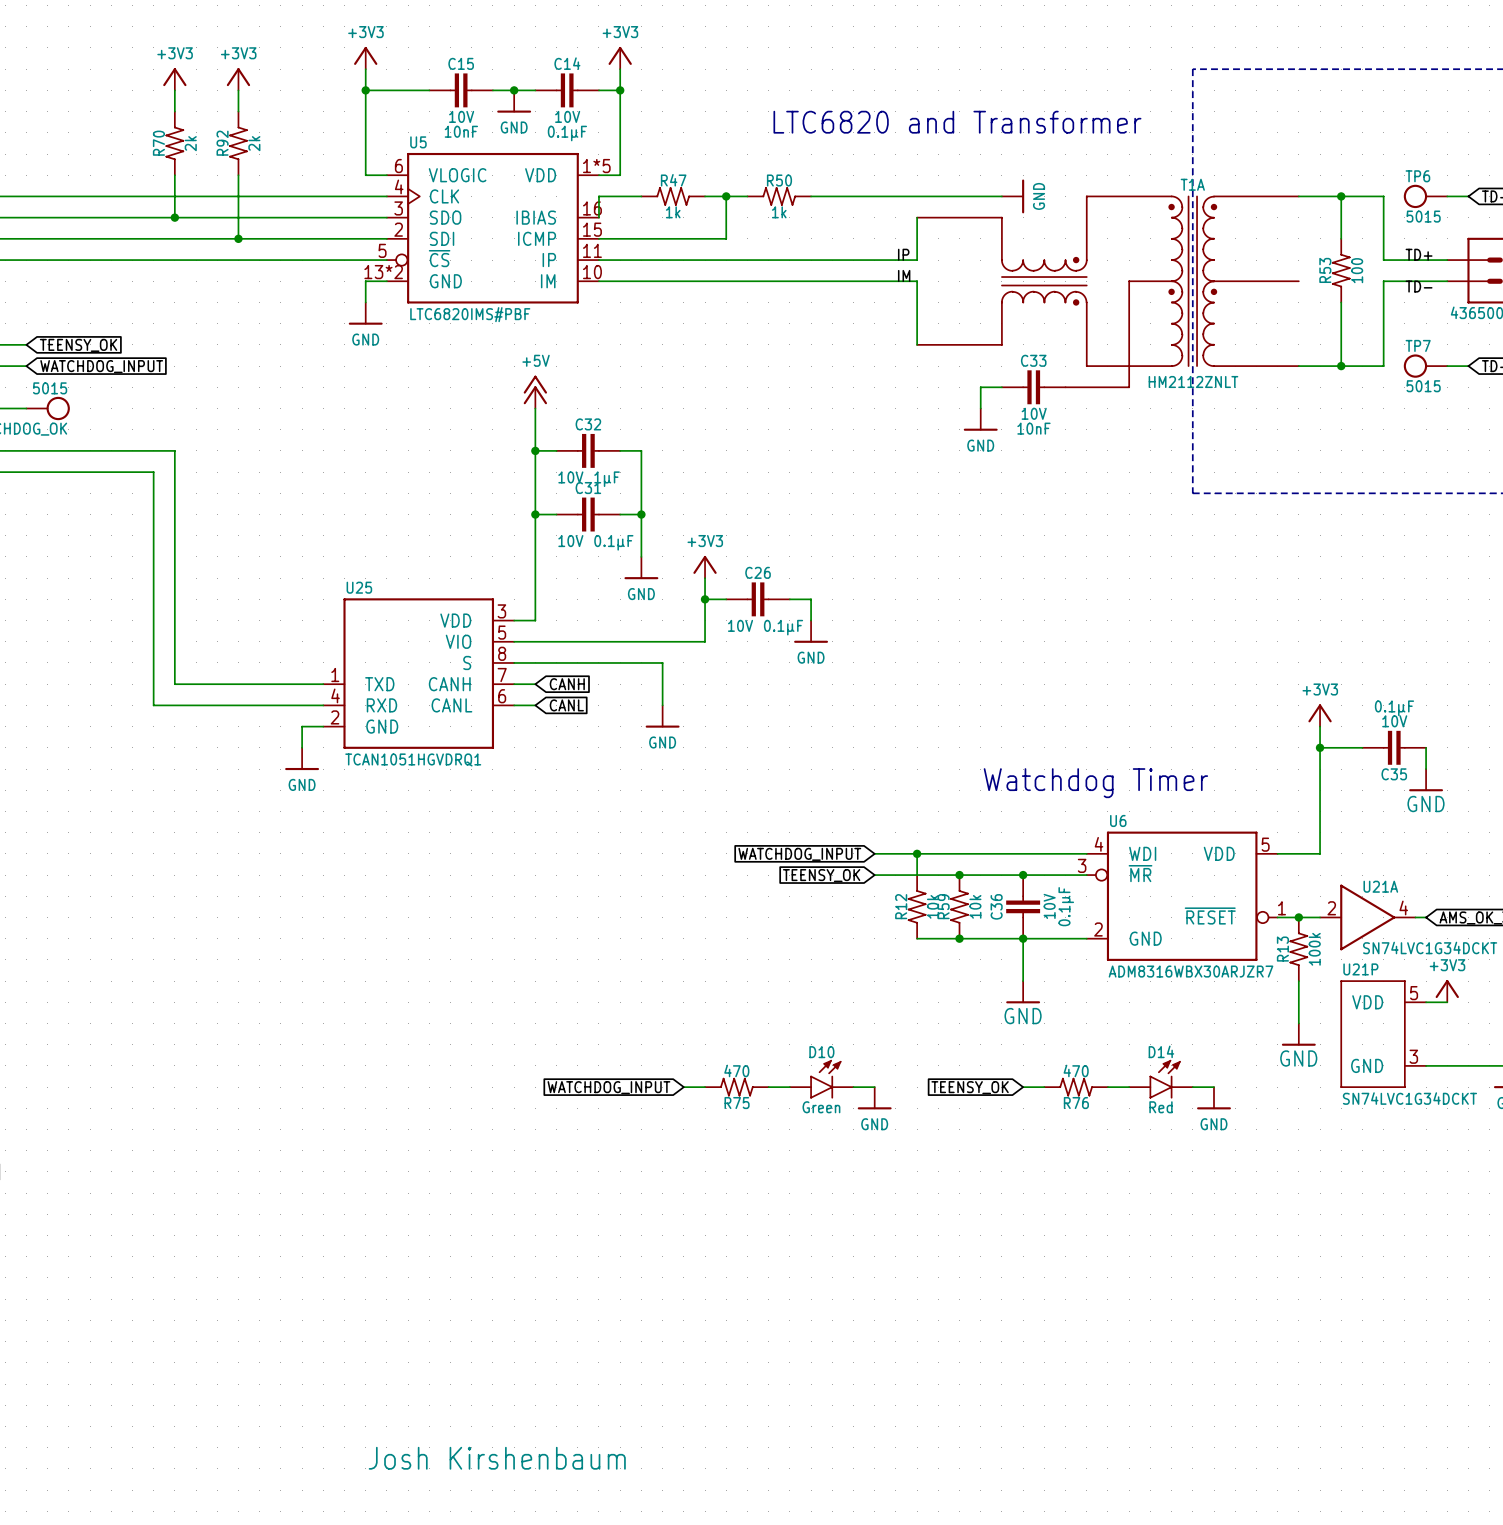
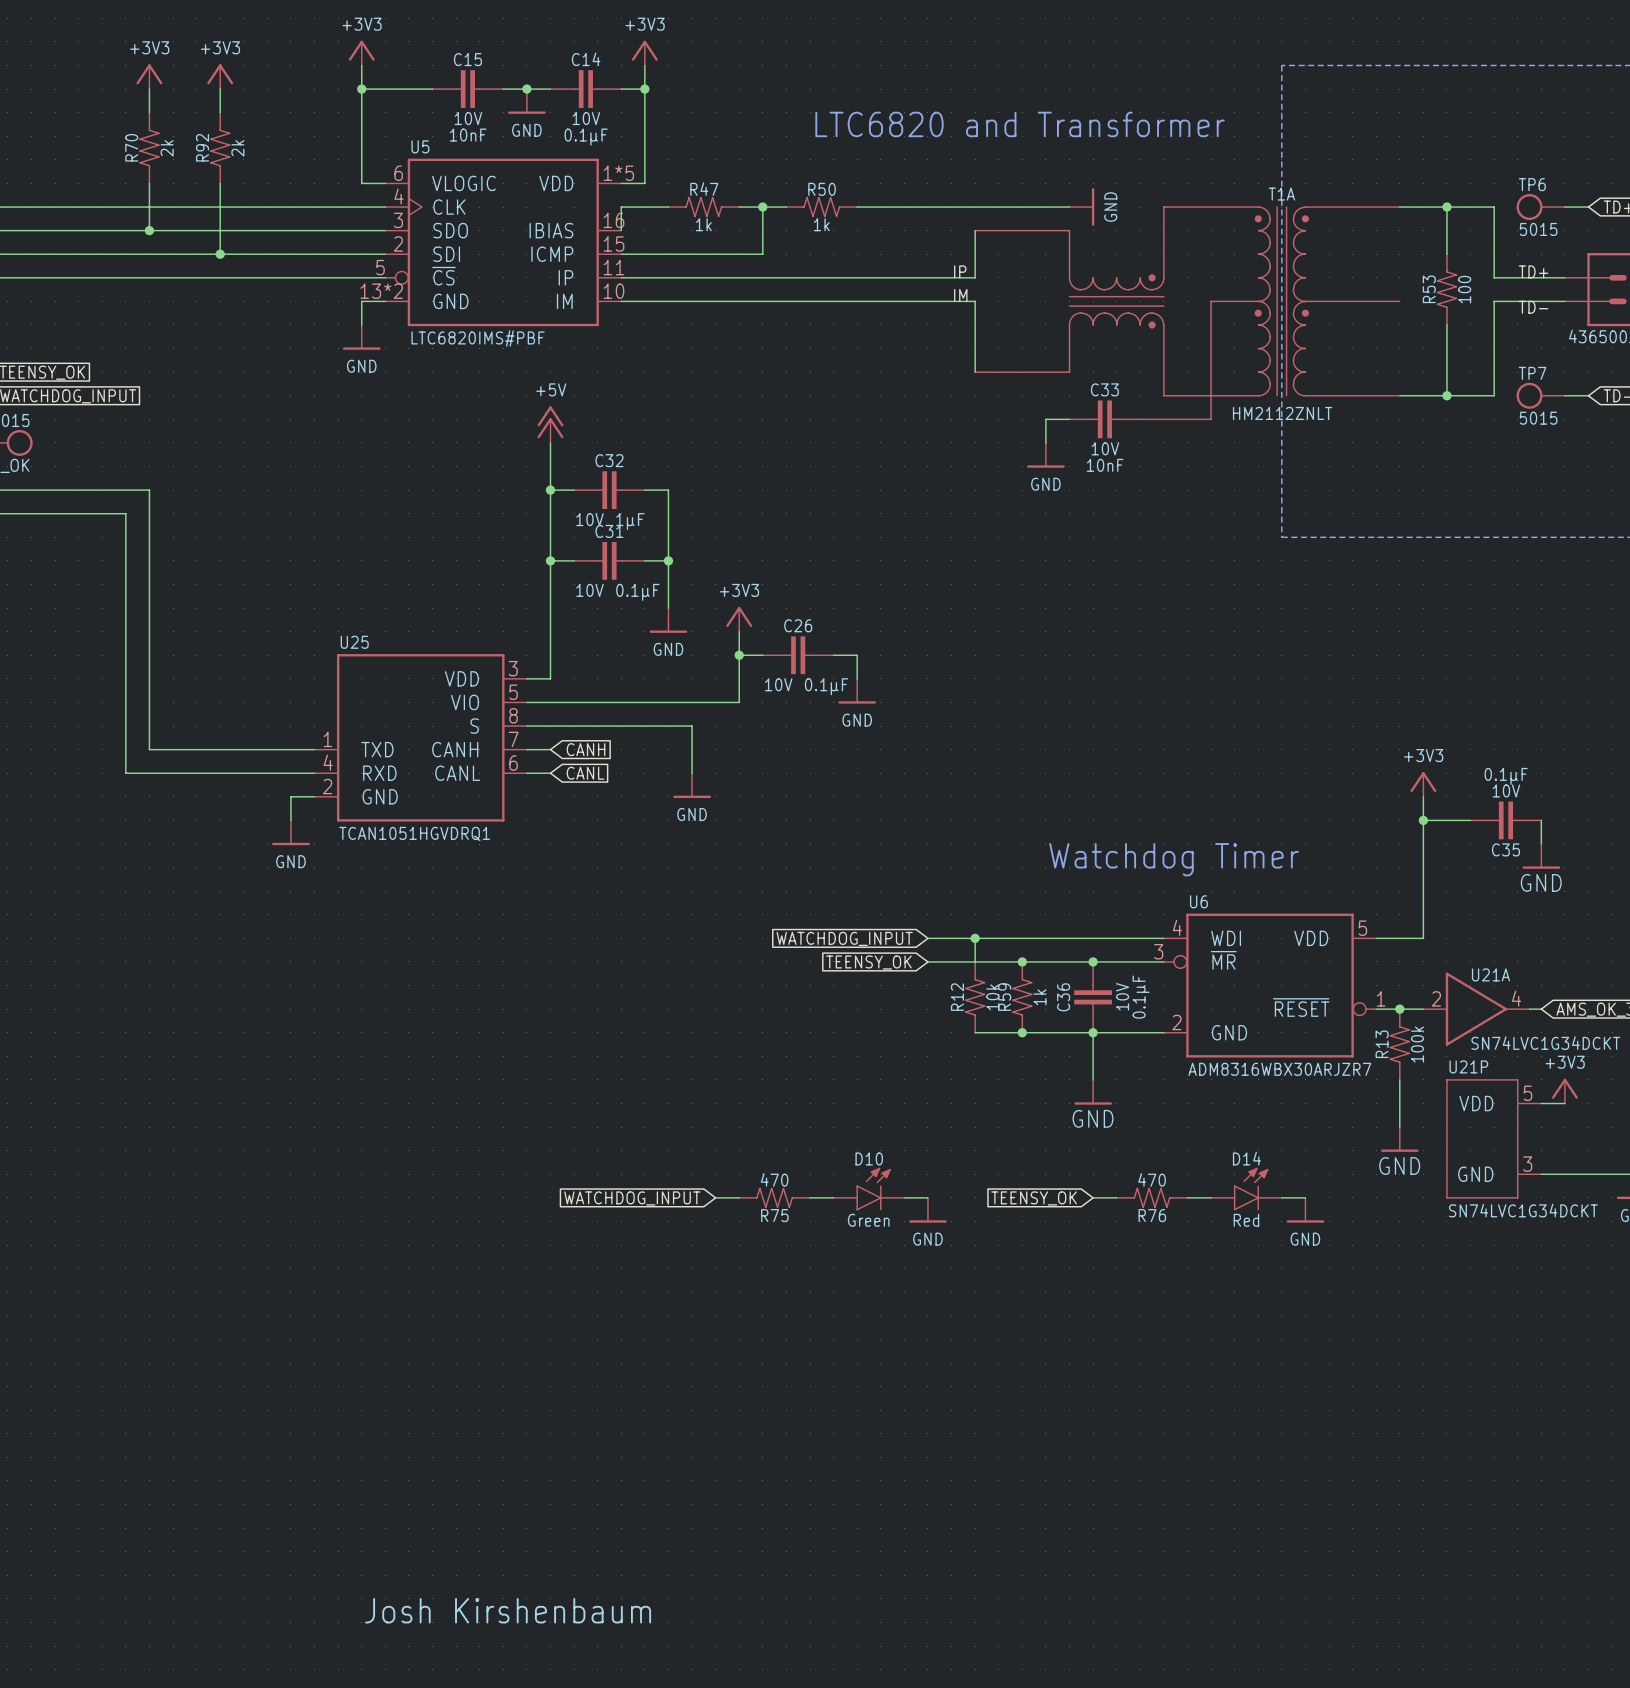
R59 text: 10k (975, 906) -> 1k (1040, 997)

